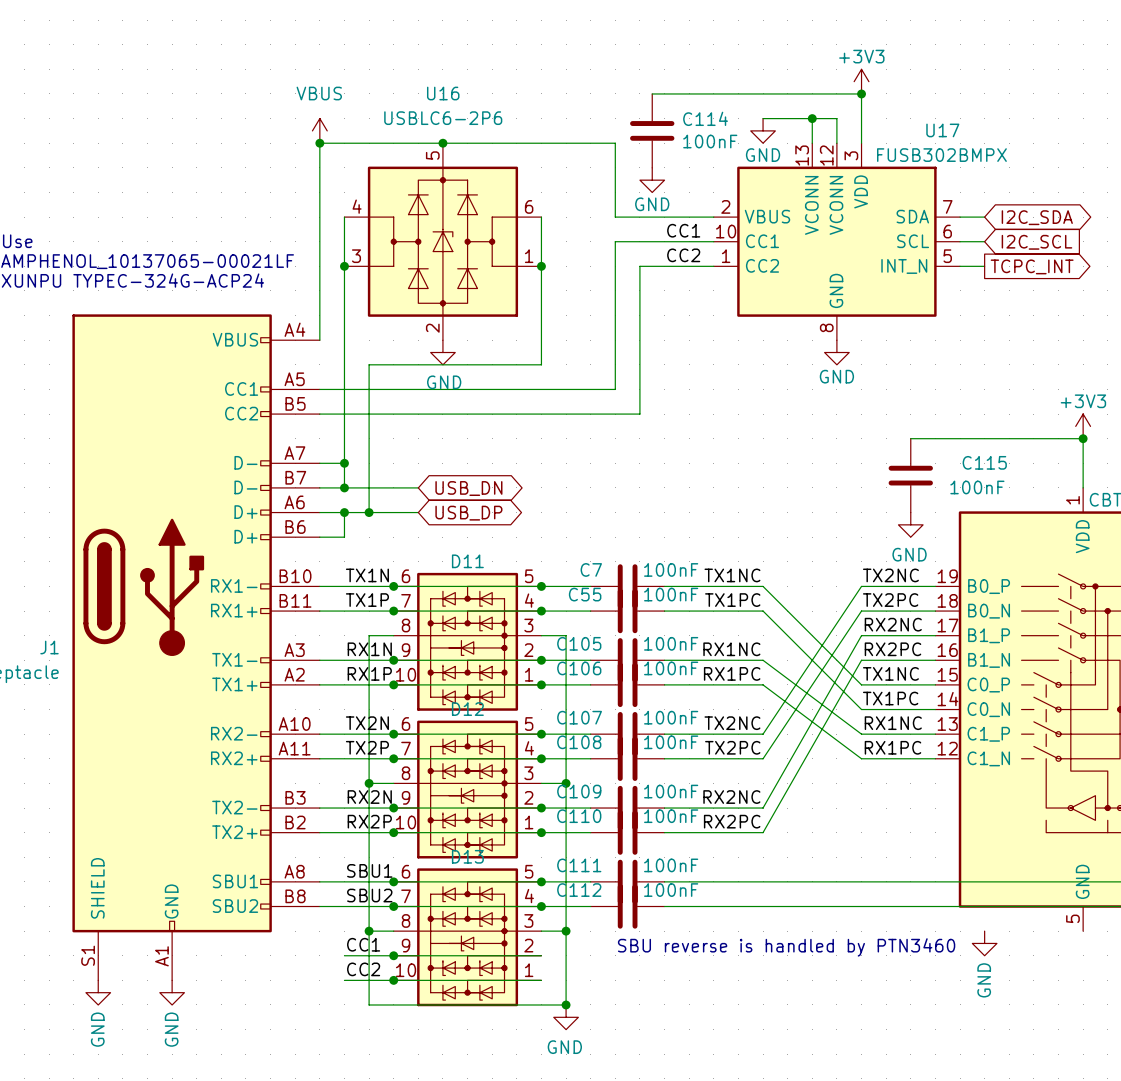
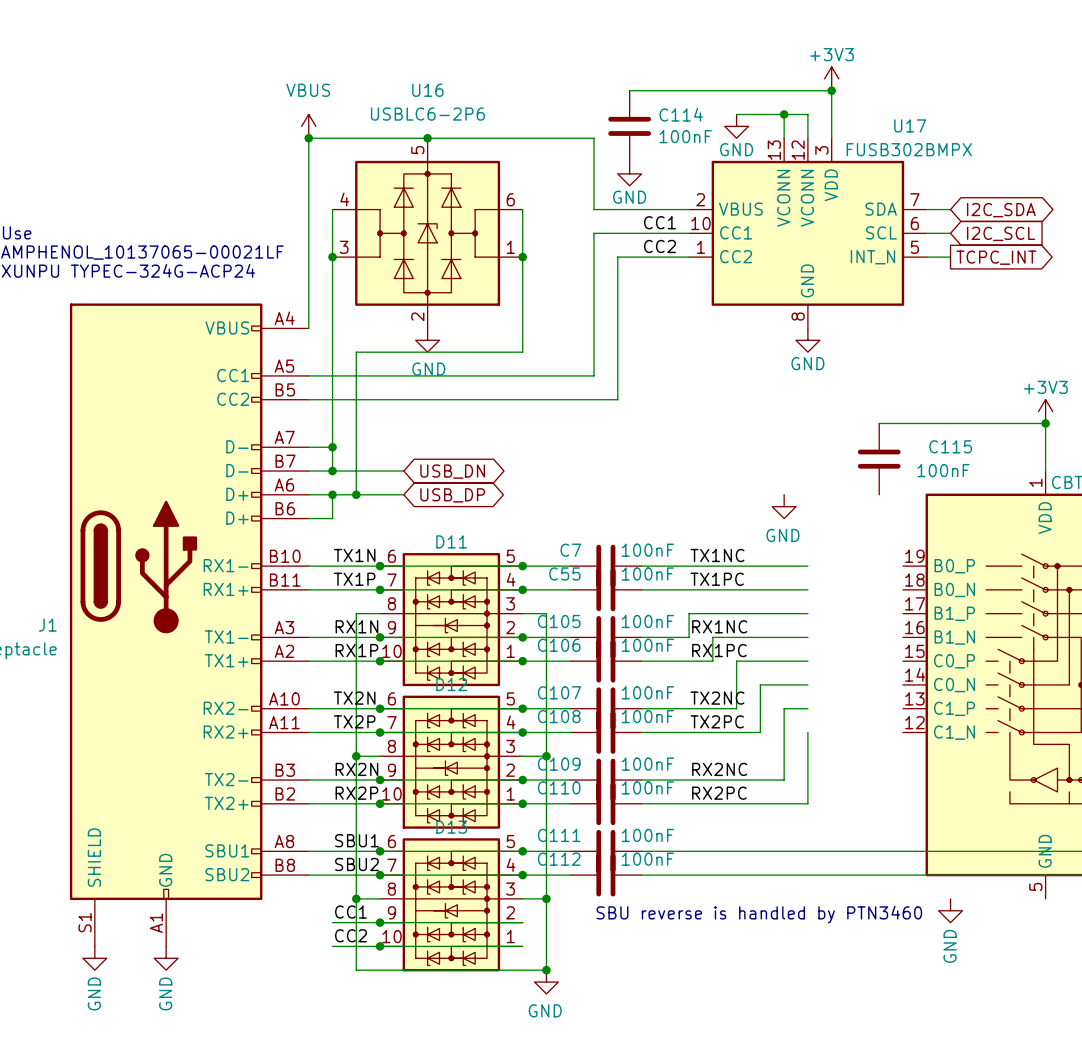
power symbol position: GND (910, 524) -> GND (784, 506)
label position: TX1NC (732, 575) -> TX1NC (717, 555)
label: TX2NC (890, 575) -> none
wire: (763, 586) (861, 684) (935, 684) -> (736, 566) (807, 566)
wire: (935, 586) (861, 586) (763, 734) -> (807, 661) (736, 661) (736, 708)
label position: TX1PC (732, 600) -> TX1PC (717, 579)
label: TX2PC (890, 600) -> none
wire: (763, 611) (861, 709) (935, 709) -> (736, 589) (807, 589)
wire: (935, 611) (861, 611) (763, 758) -> (807, 684) (760, 684) (760, 732) (736, 732)
label: RX2NC (893, 624) -> none
wire: none -> (807, 613) (689, 613) (689, 637)
wire: (935, 635) (861, 635) (763, 808) -> (807, 708) (784, 708) (784, 780) (736, 780)
label position: RX1NC (731, 649) -> RX1NC (719, 626)
label: RX2PC (892, 649) -> none
wire: (713, 660) (738, 660) -> (712, 661) (712, 637)
wire: (763, 660) (861, 734) (935, 734) -> (736, 637) (807, 637)
wire: (935, 660) (861, 660) (763, 832) -> (807, 732) (807, 803) (736, 803)
label position: RX1PC (732, 673) -> RX1PC (719, 650)
label: TX1NC (890, 673) -> none
wire: (738, 684) (763, 684) (861, 758) (935, 758) -> none
label: TX1PC (890, 698) -> none
label position: TX2NC (732, 723) -> TX2NC (717, 698)
label: RX1NC (893, 723) -> none
label position: TX2PC (732, 747) -> TX2PC (717, 721)
label: RX1PC (892, 747) -> none
label position: RX2NC (731, 797) -> RX2NC (719, 769)
label position: RX2PC (732, 821) -> RX2PC (719, 793)

